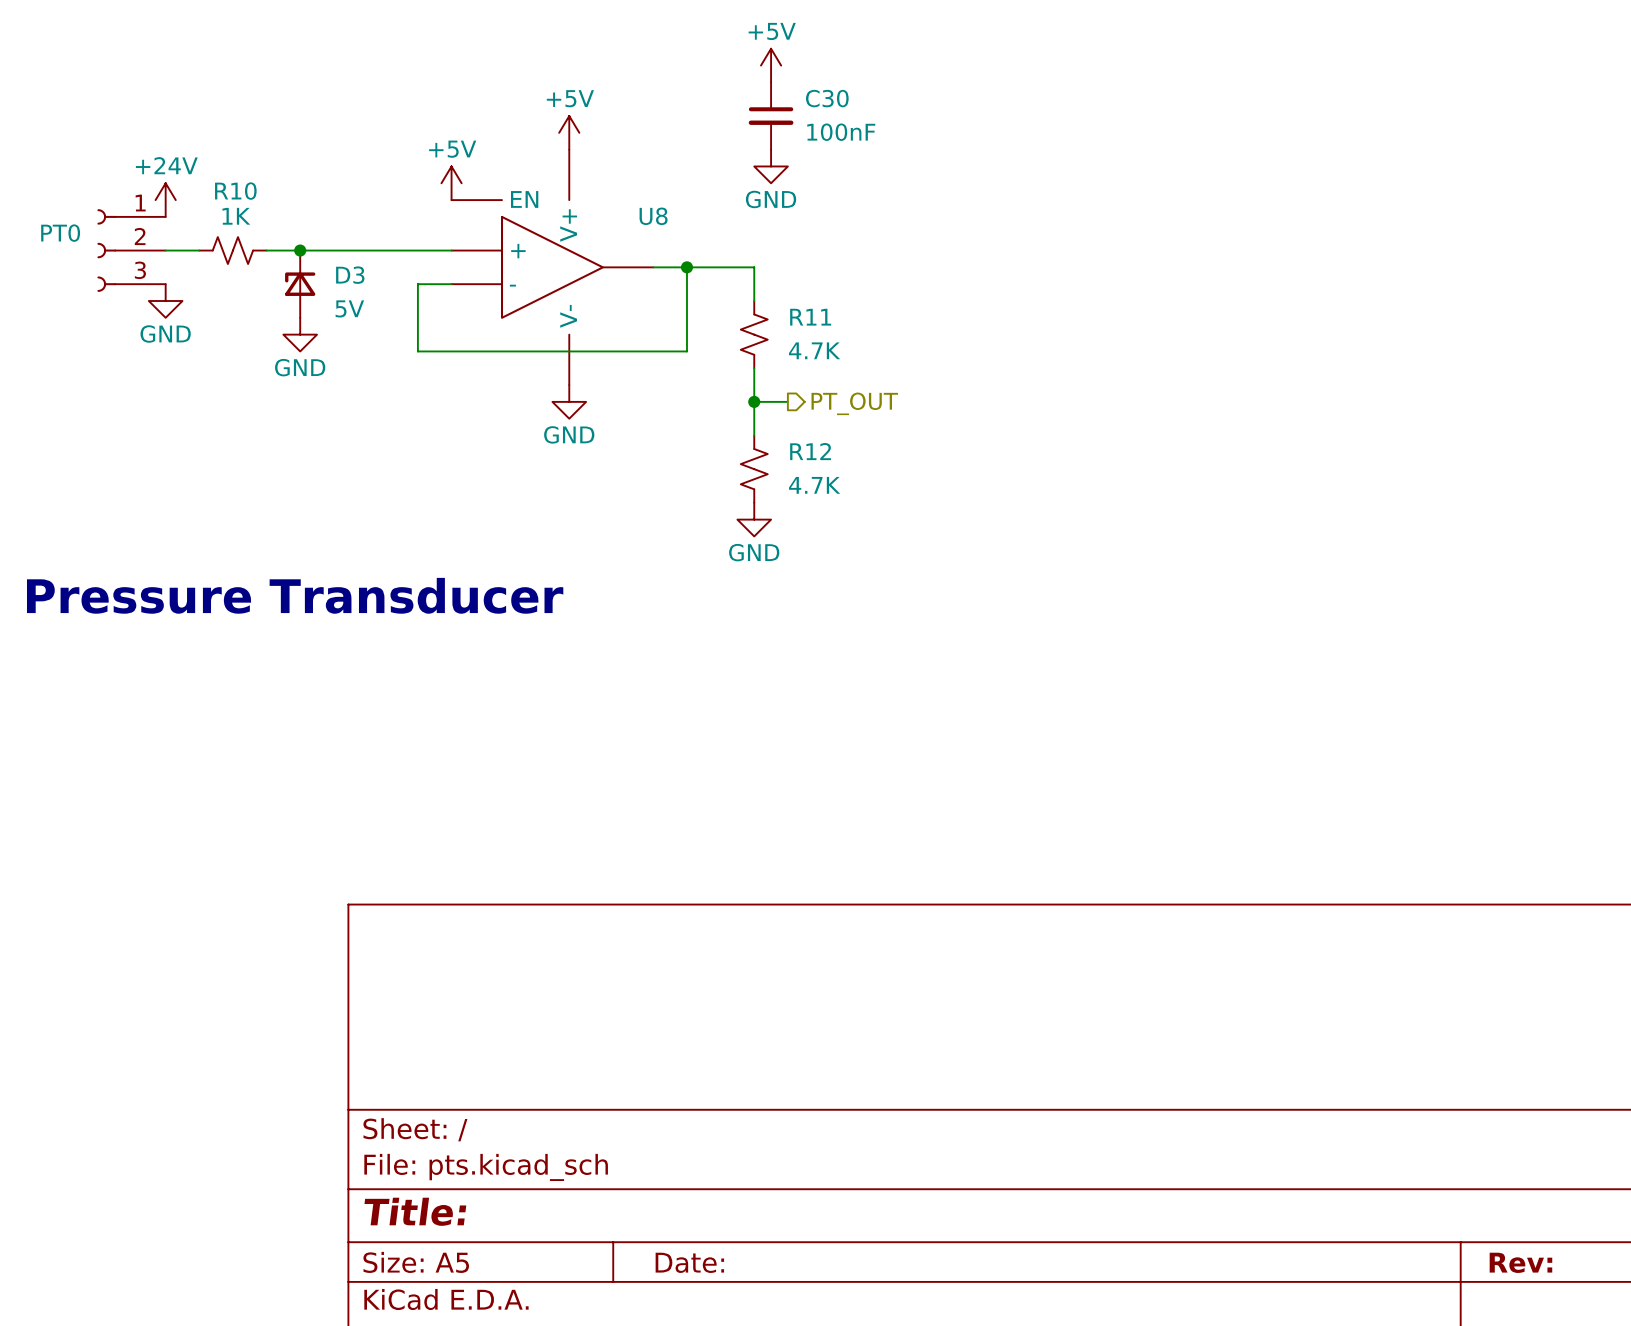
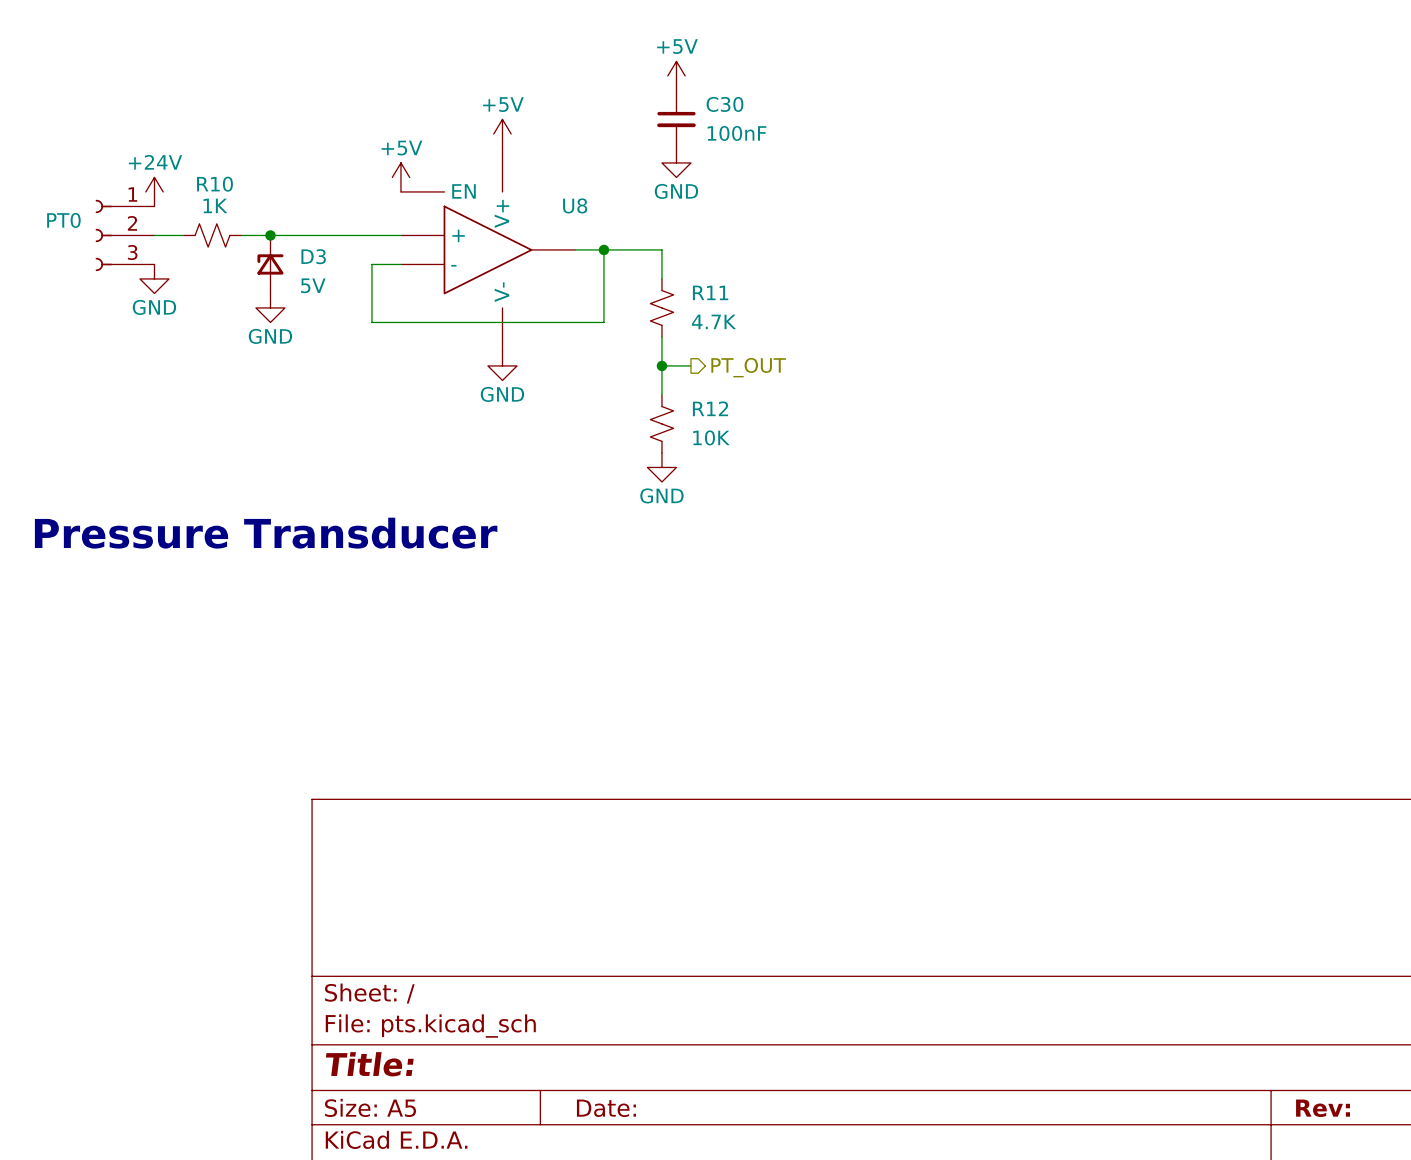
R12 value: 4.7K (814, 485) -> 10K (711, 437)

